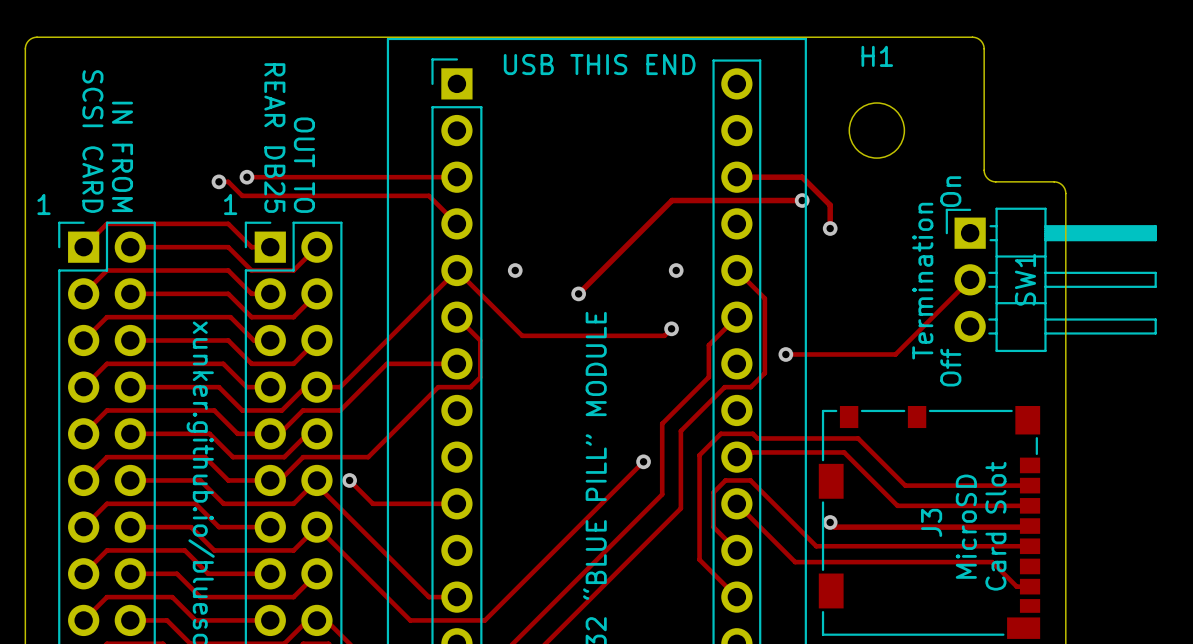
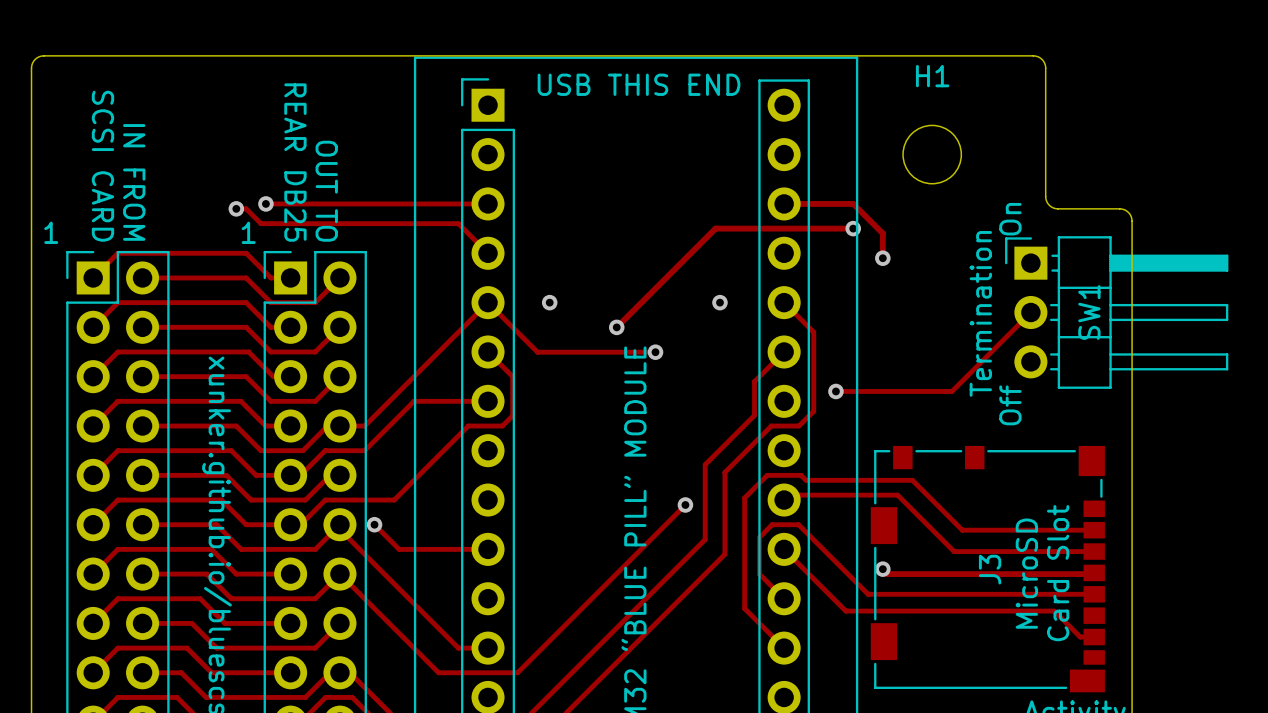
track: (503, 317) (522, 335) (664, 335) (671, 328) -> (537, 352) (655, 352)
via position: (671, 328) -> (655, 352)

